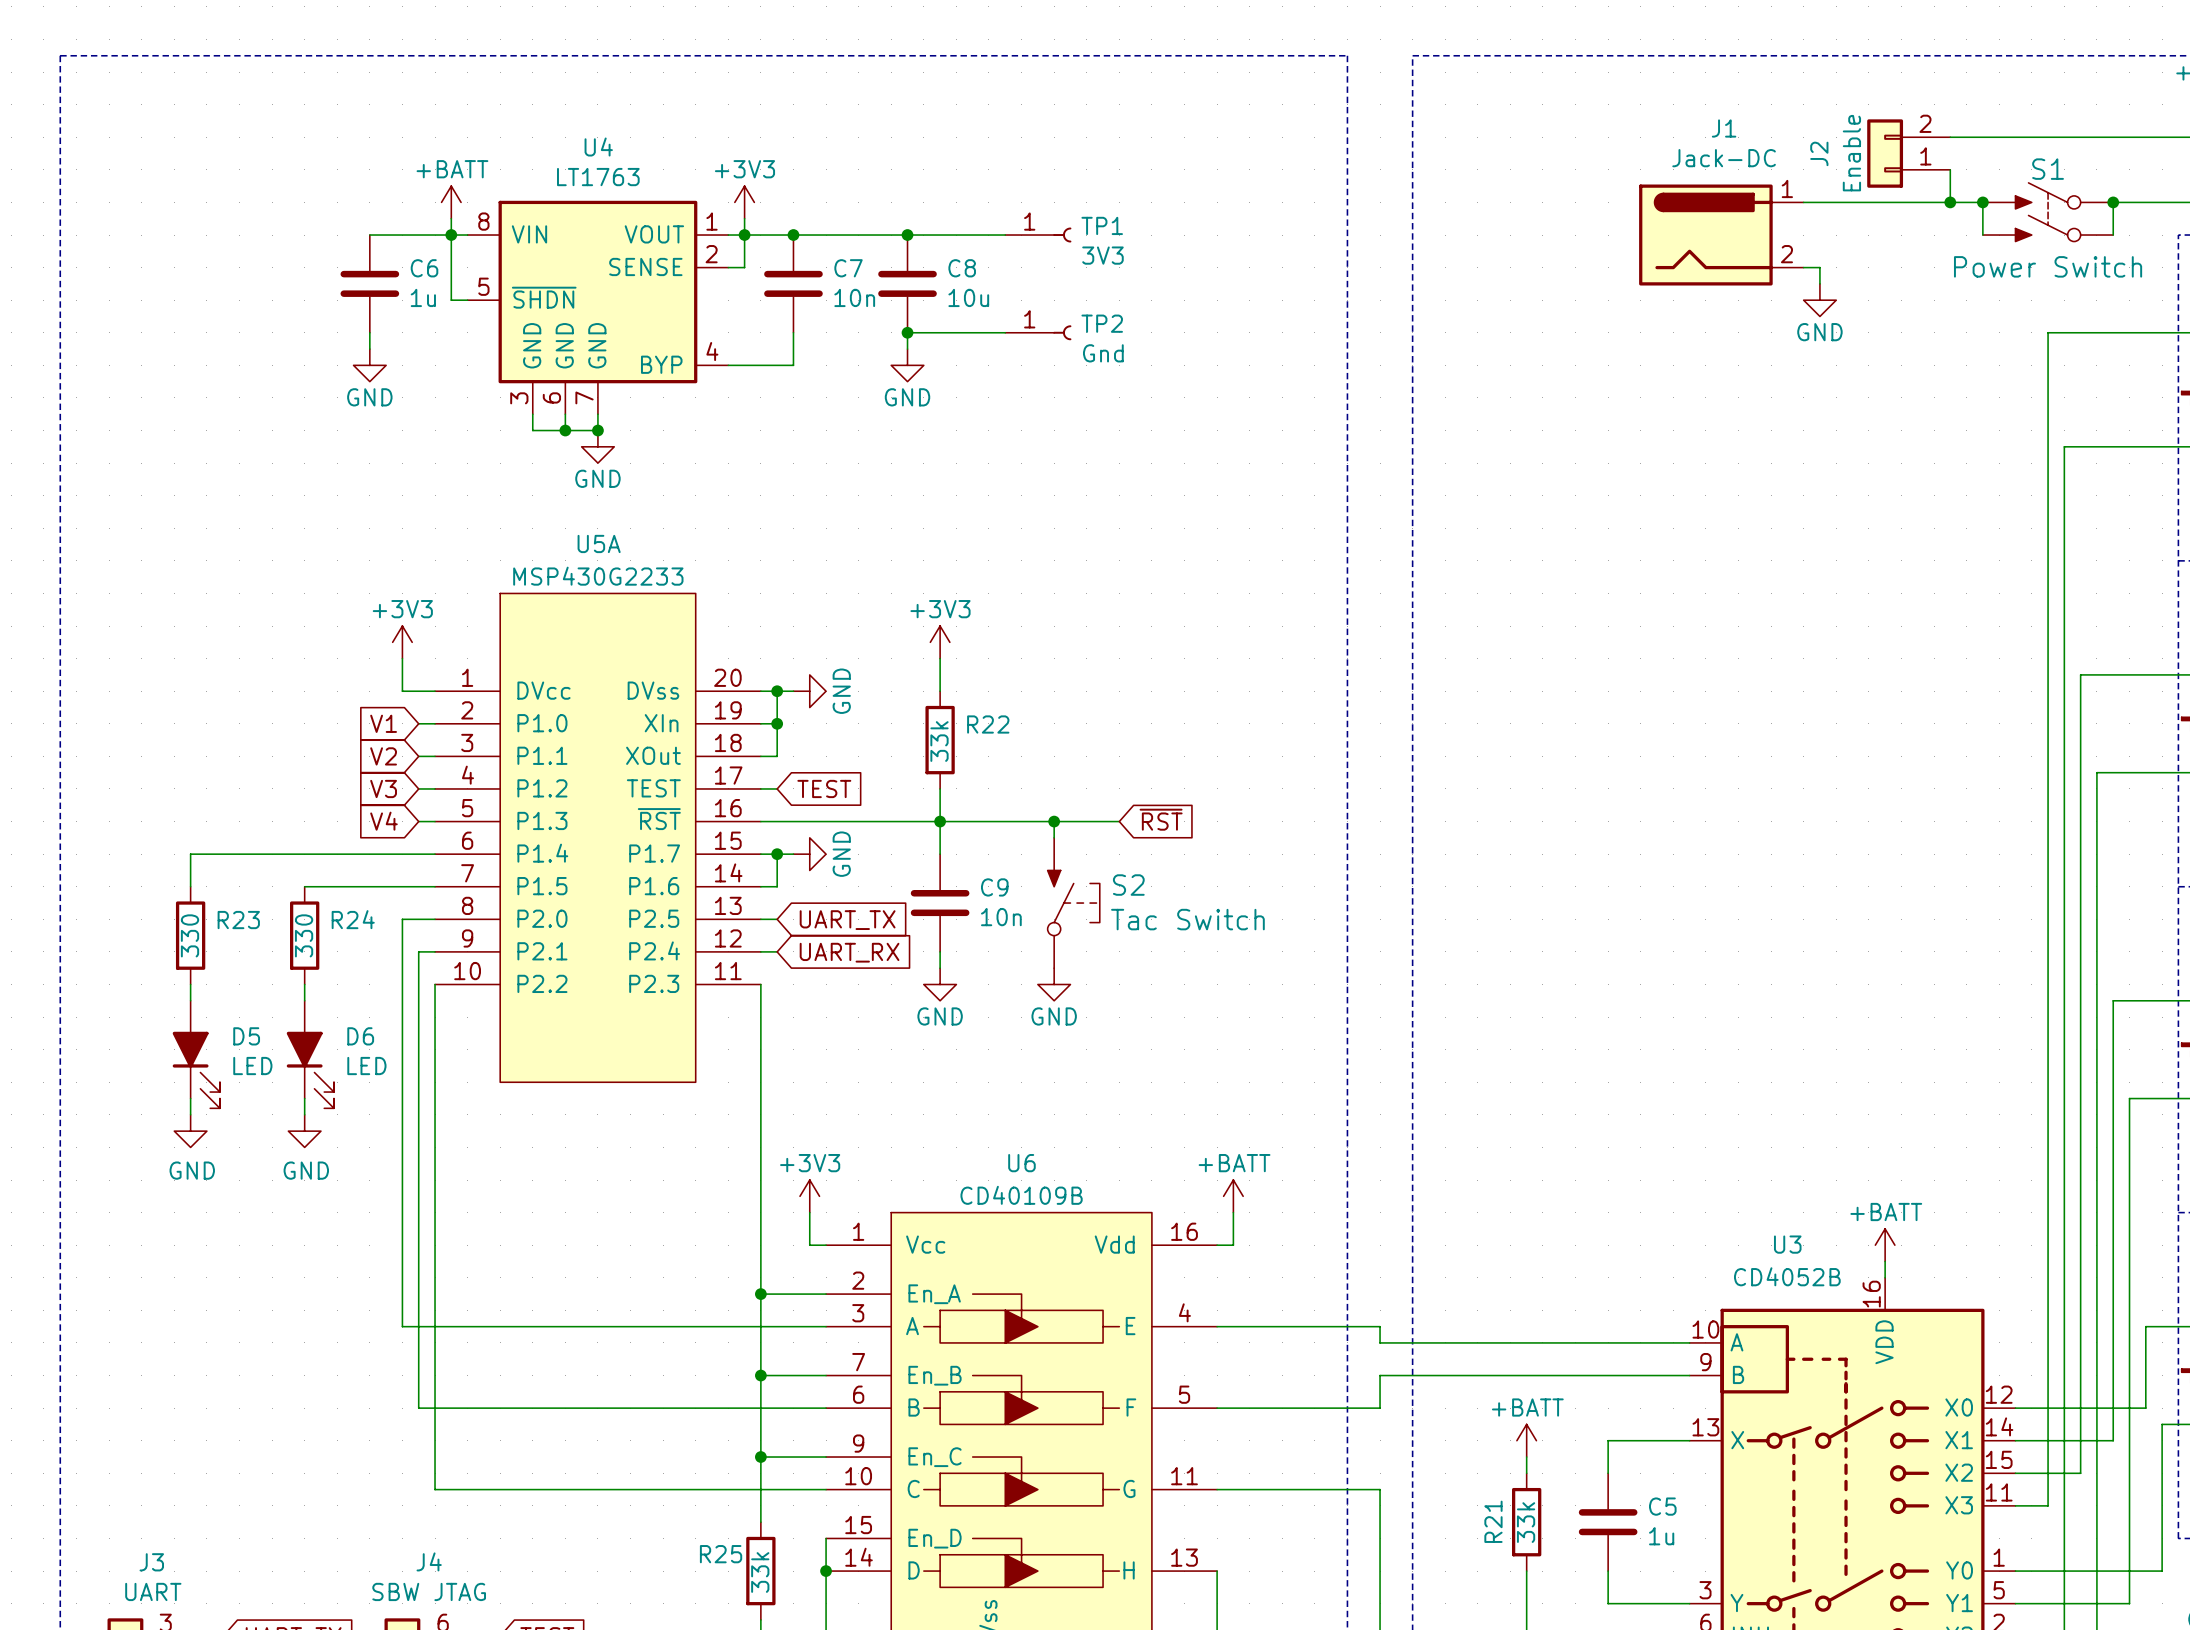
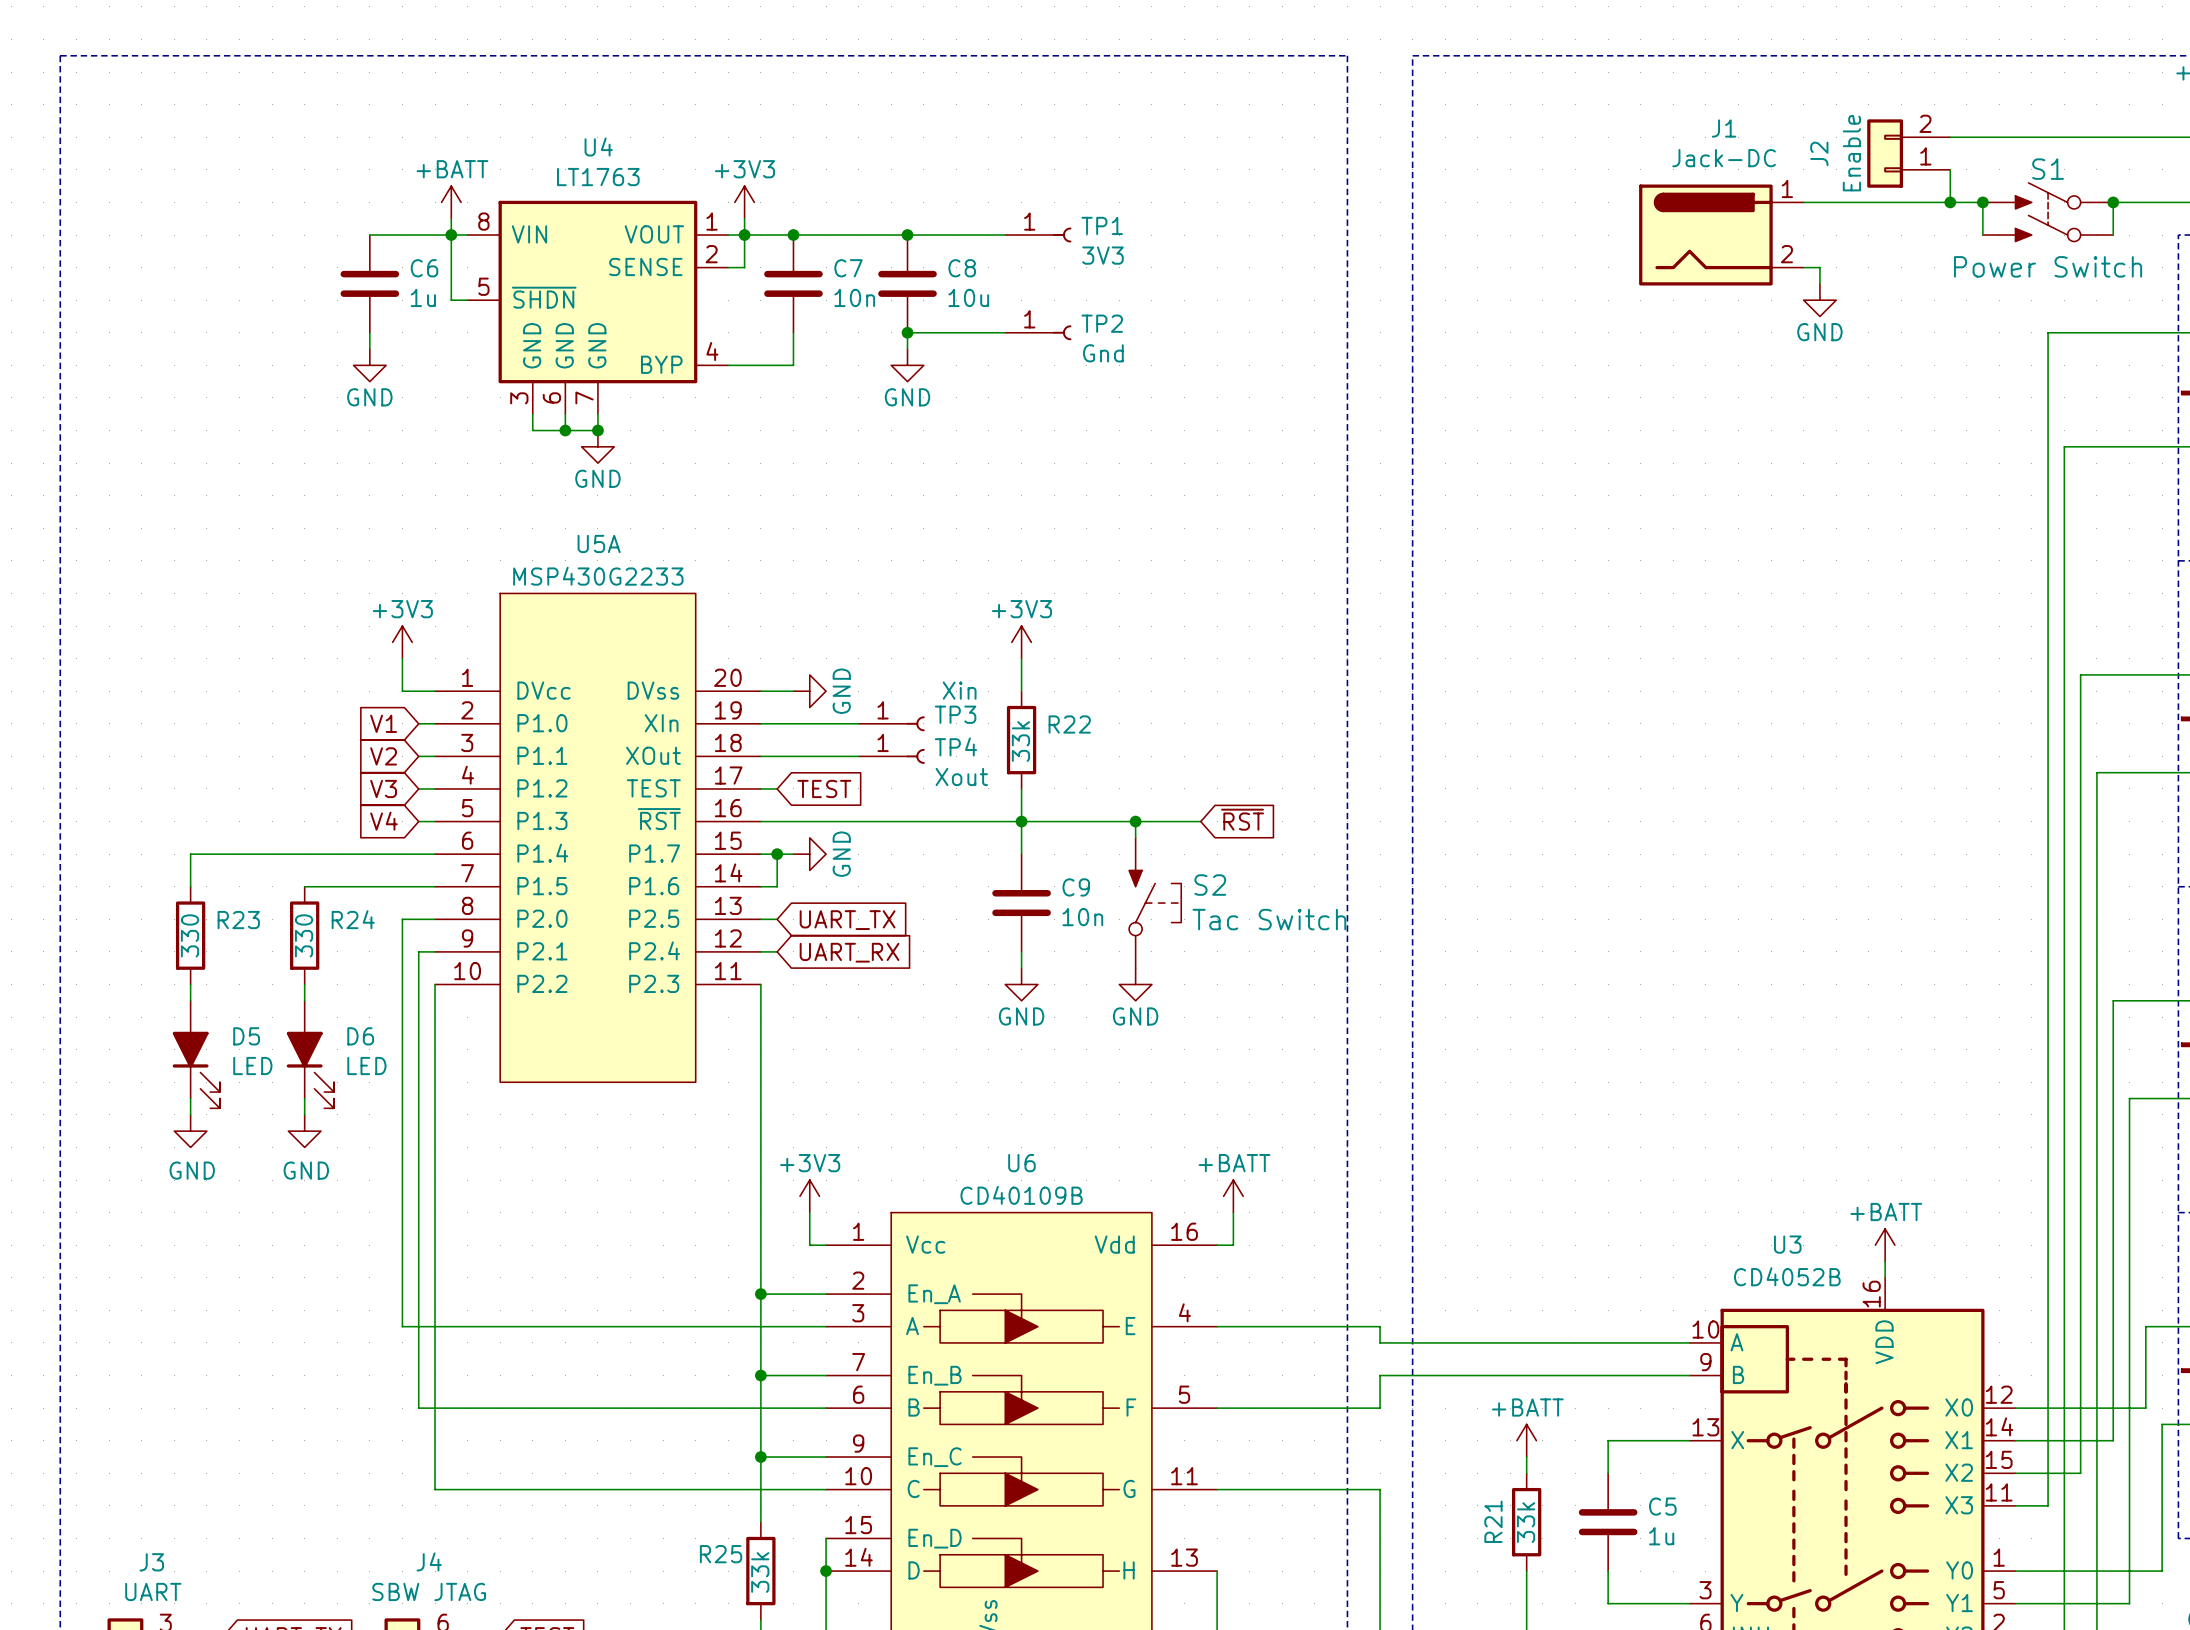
power symbol position: +3V3 (940, 642) -> +3V3 (1021, 642)
wire: (940, 658) (940, 691) -> (1021, 658) (1021, 691)
wire: (777, 691) (777, 756) -> (858, 756) (777, 756)
junction: (777, 691) -> none
wire: none -> (777, 723) (858, 723)
junction: (777, 723) -> none
TP3: none -> Xin (891, 723)
R22 position: (940, 740) -> (1021, 740)
TP4: none -> Xout (891, 756)
wire: (940, 788) (940, 854) -> (1021, 788) (1021, 854)
global label position: ~{RST} (1161, 819) -> ~{RST} (1242, 819)
junction: (940, 821) -> none
wire: (1054, 821) (1054, 837) -> (1135, 821) (1135, 837)
junction position: (1054, 821) -> (1021, 821)
wire: none -> (1119, 821) (1200, 821)
junction: none -> (1135, 821)
C9 position: (940, 903) -> (1021, 903)
S2 position: (1073, 903) -> (1155, 903)
wire: (940, 951) (940, 968) -> (1021, 951) (1021, 968)
power symbol: GND (940, 984) -> none
power symbol position: GND (1054, 984) -> GND (1021, 984)
power symbol: none -> GND (1135, 984)

